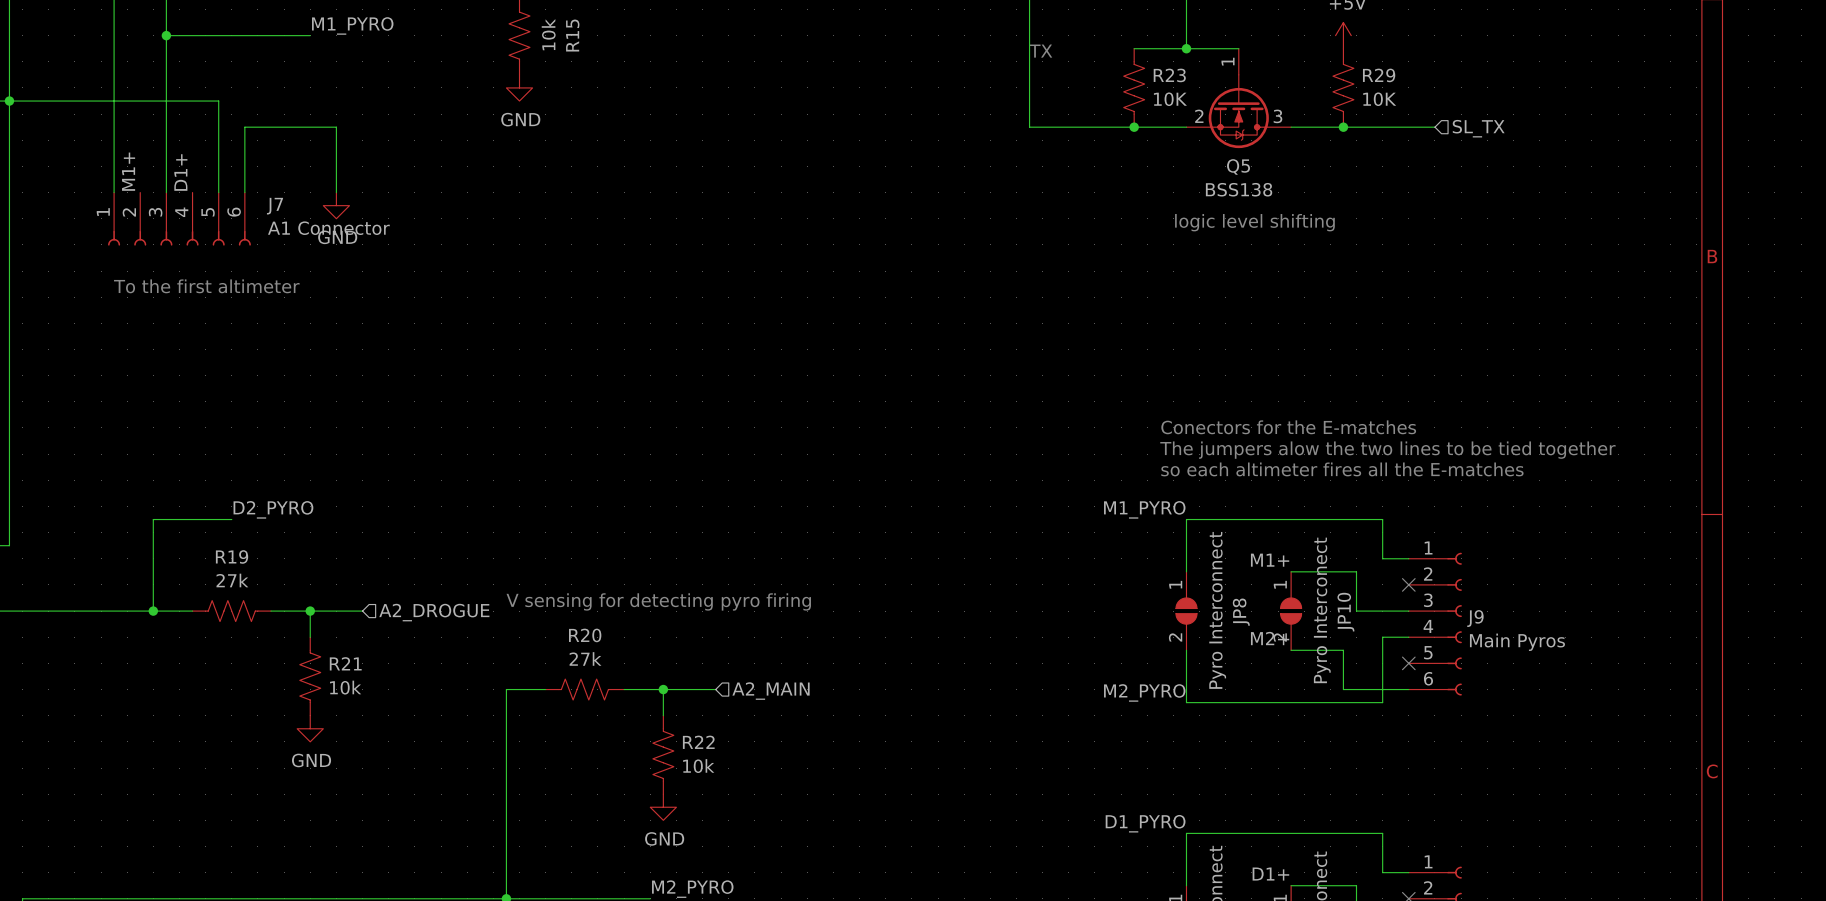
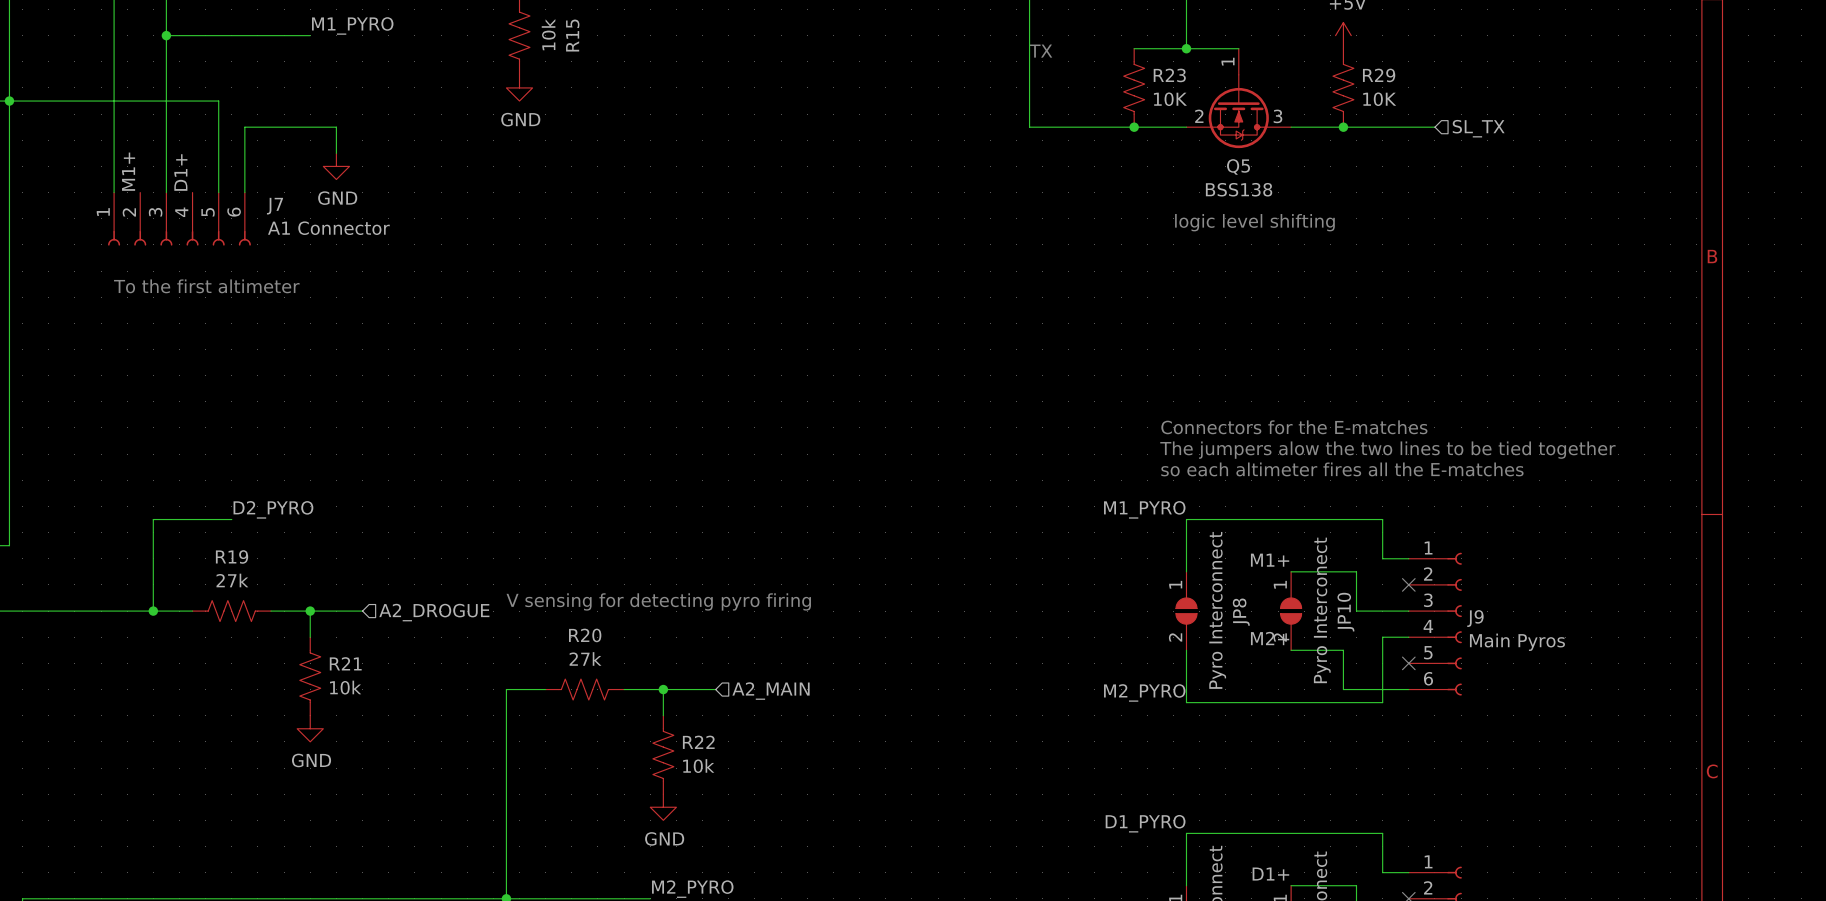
wire: (336, 153) (336, 192) -> none
power symbol position: GND (336, 205) -> GND (336, 166)
text: Conectors for the E-matches (1288, 427) -> Connectors for the E-matches (1294, 427)

